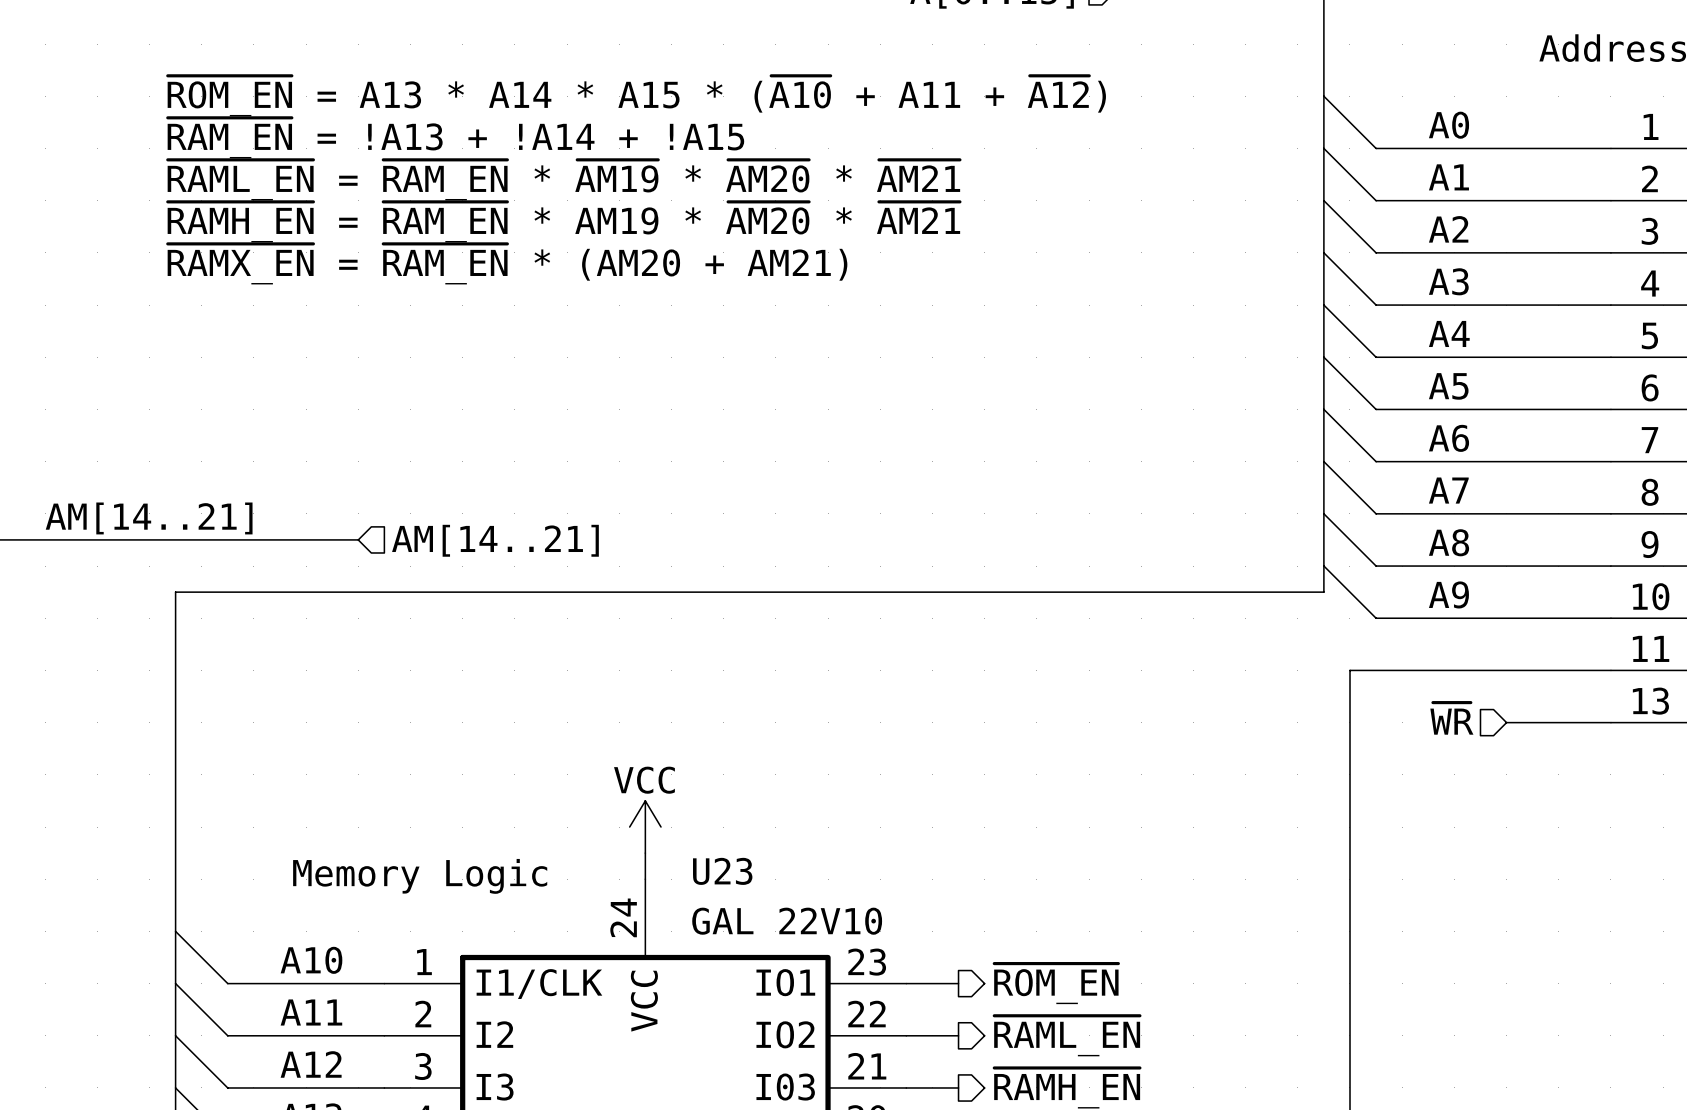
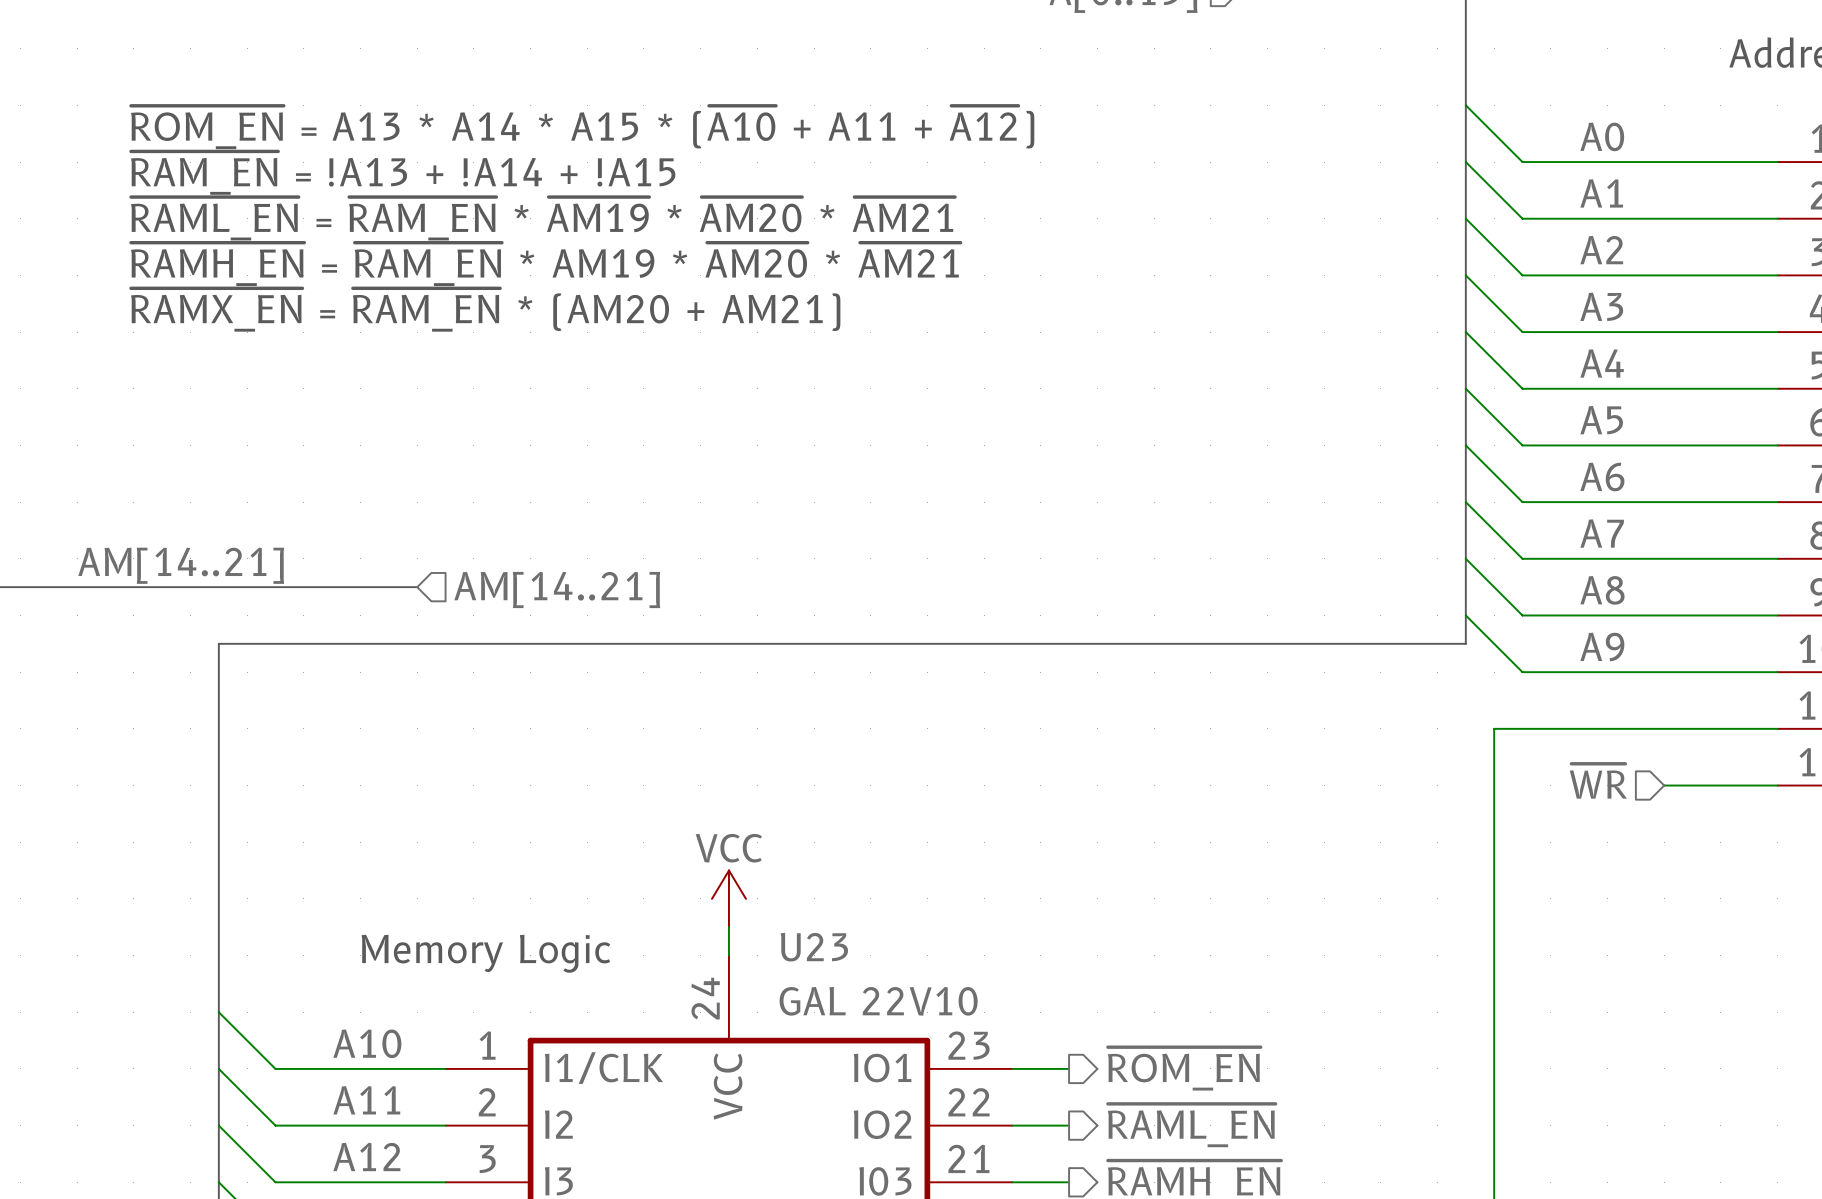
text position: ~{ROM_EN} = A13 * A14 * A15 * (~{A10} + A11 + ~{A12}) (636, 96) -> ~{ROM_EN} = A13 * A14 * A15 * (~{A10} + A11 + ~{A12}) (582, 127)
text position: ~{RAM_EN} = !A13 + !A14 + !A15 (455, 138) -> ~{RAM_EN} = !A13 + !A14 + !A15 (403, 173)
text position: ~{RAML_EN} = ~{RAM_EN} * ~{AM19} * ~{AM20} * ~{AM21} (563, 180) -> ~{RAML_EN} = ~{RAM_EN} * ~{AM19} * ~{AM20} * ~{AM21} (543, 218)
text position: ~{RAMH_EN} = ~{RAM_EN} * AM19 * ~{AM20} * ~{AM21} (563, 222) -> ~{RAMH_EN} = ~{RAM_EN} * AM19 * ~{AM20} * ~{AM21} (545, 264)
text position: ~{RAMX_EN} = ~{RAM_EN} * (AM20 + AM21) (507, 264) -> ~{RAMX_EN} = ~{RAM_EN} * (AM20 + AM21) (485, 309)

